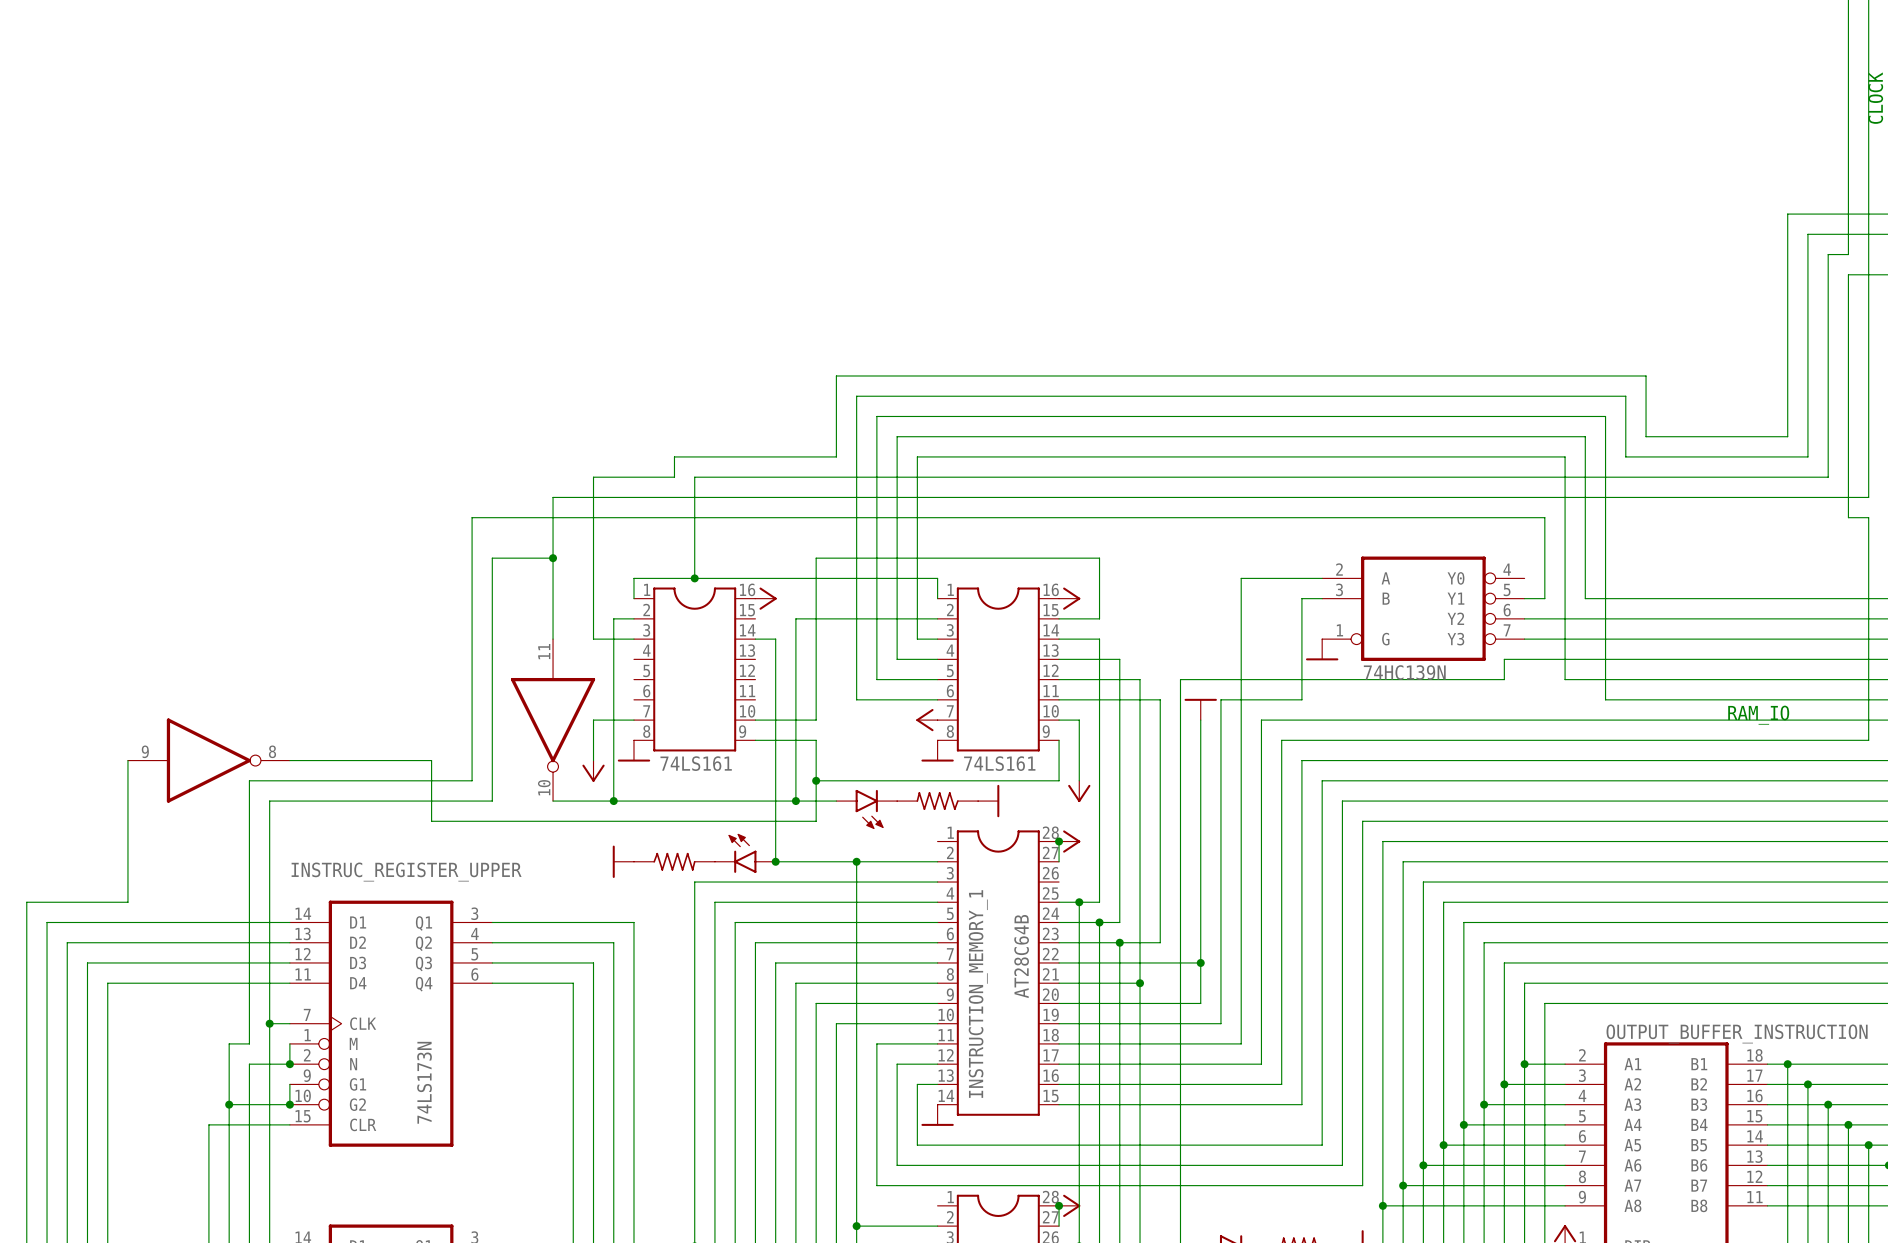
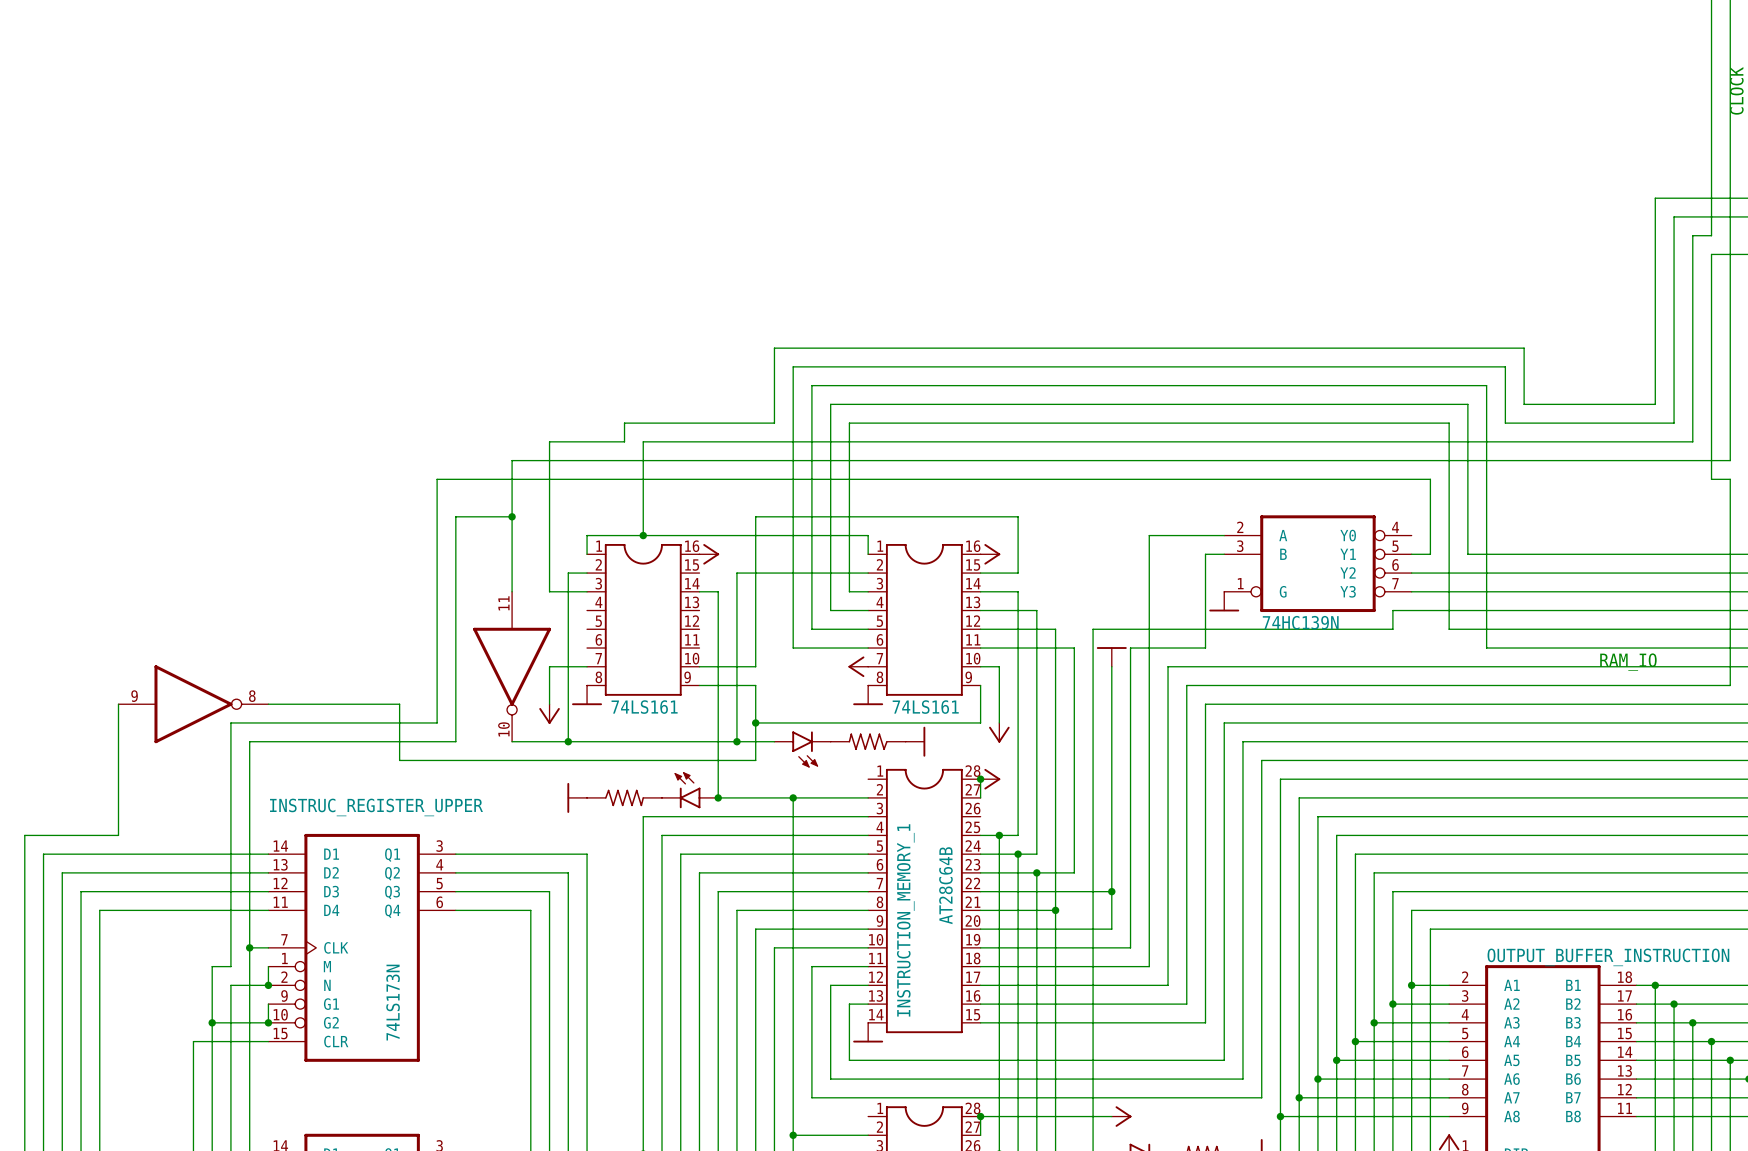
wire: none -> (980, 1116) (1111, 1116)
power symbol position: (1069, 1205) -> (1121, 1116)

